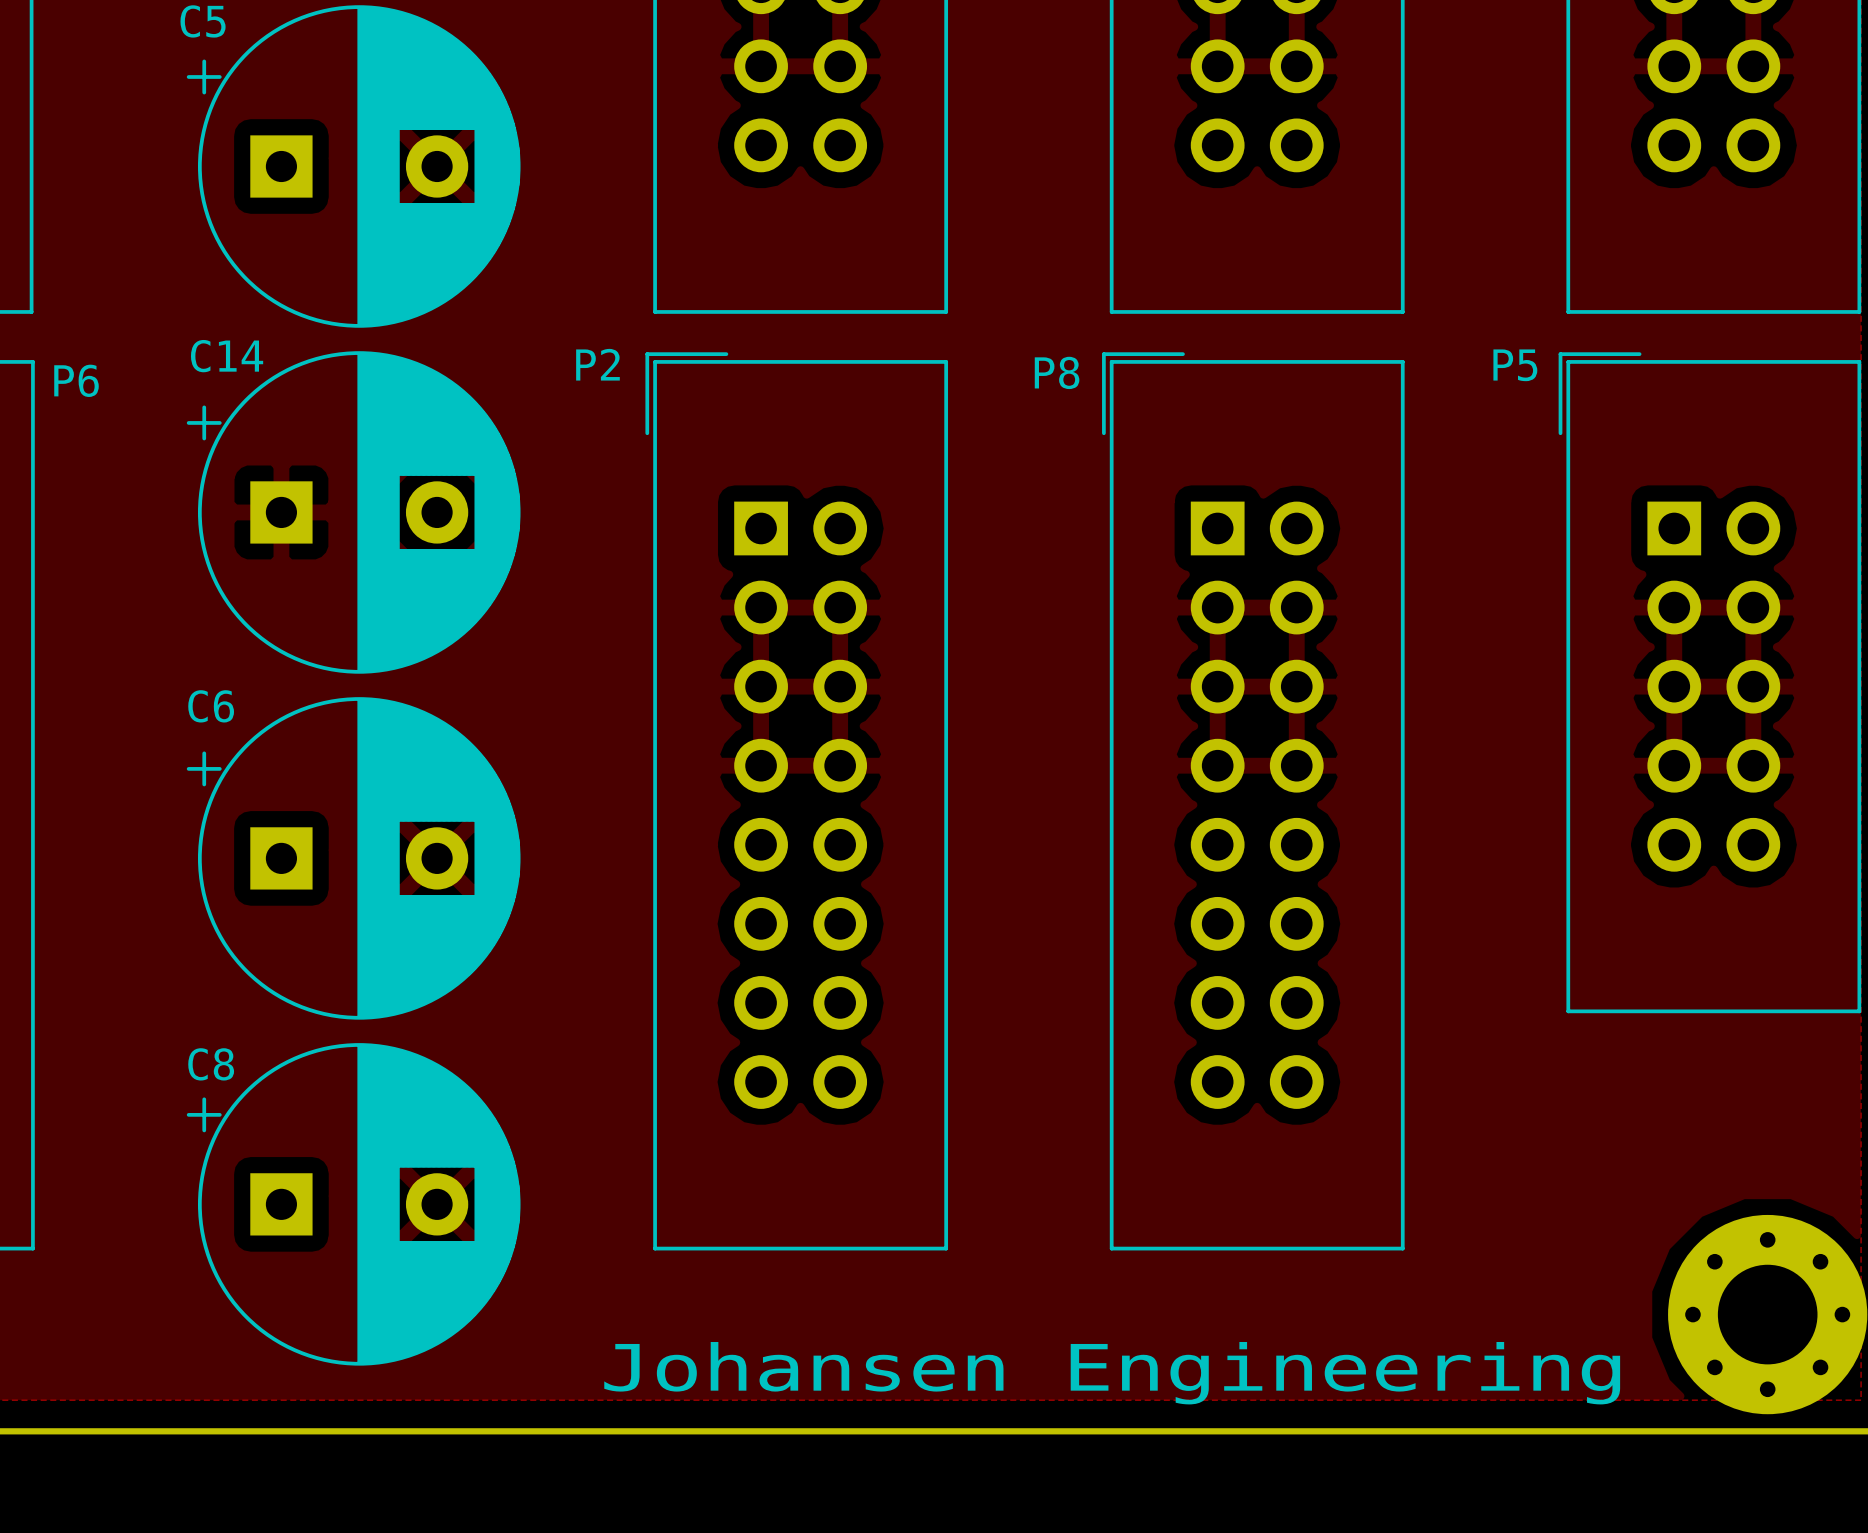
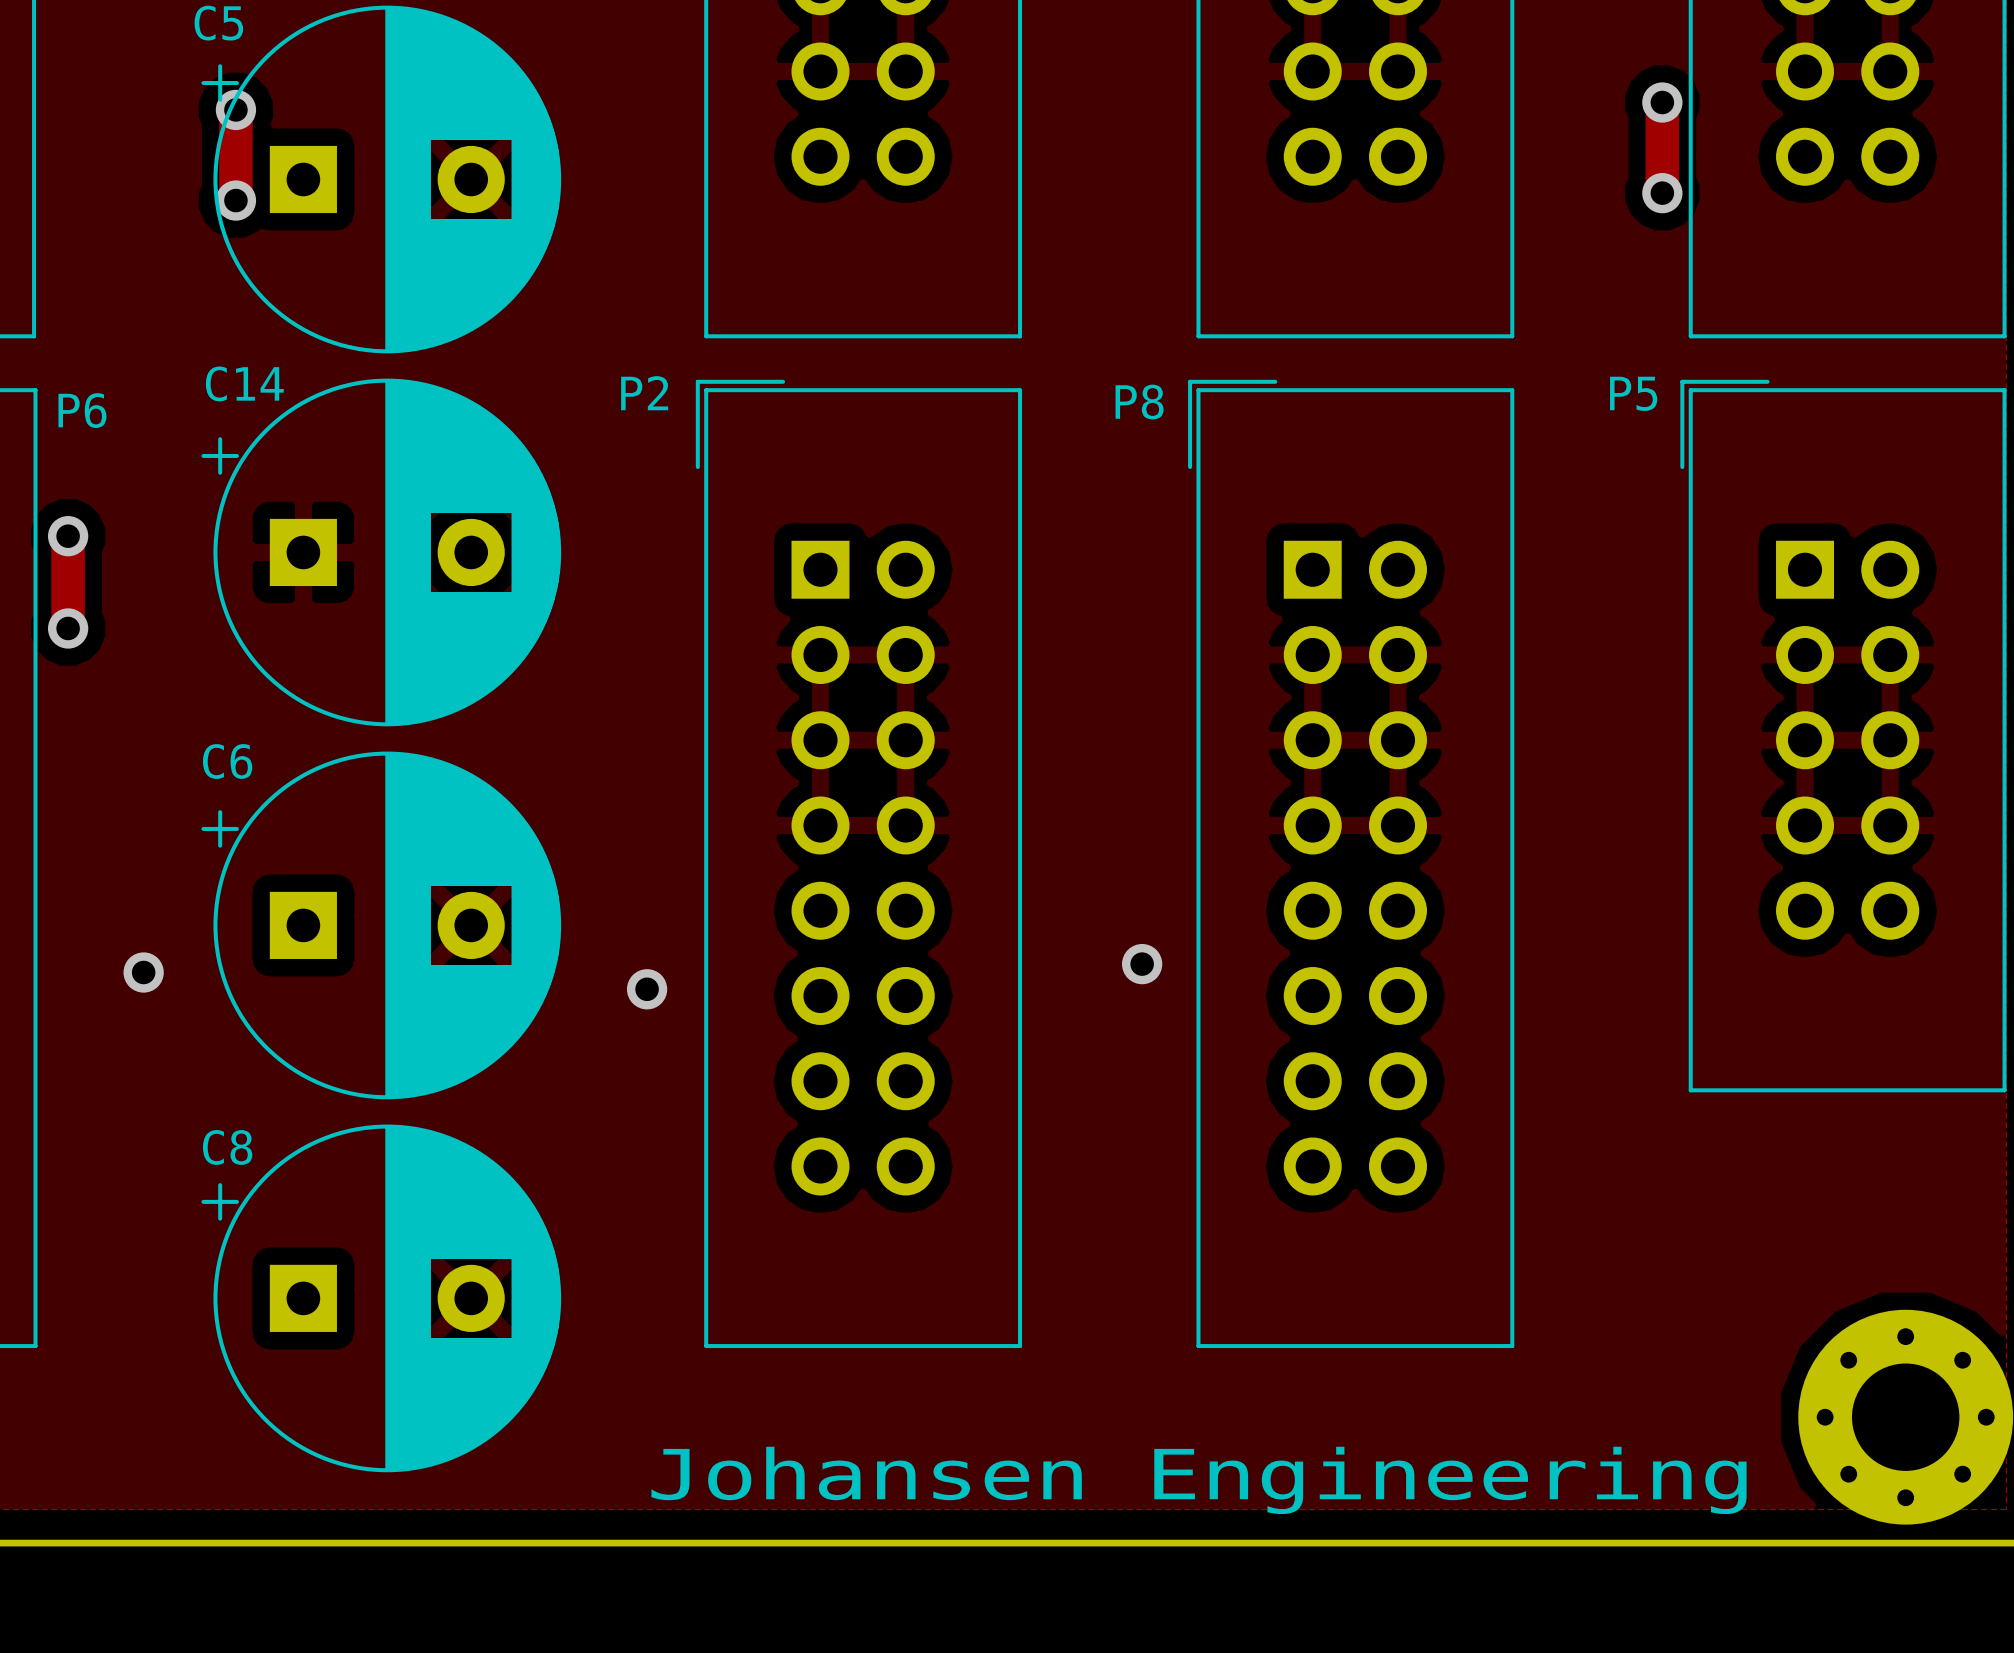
track: none -> (1662, 102) (1662, 193)
via: none -> (1662, 102)
track: none -> (235, 109) (235, 200)
via: none -> (235, 109)
via: none -> (1662, 193)
via: none -> (235, 200)
track: none -> (68, 536) (68, 628)
via: none -> (68, 536)
via: none -> (68, 628)
via: none -> (1142, 964)
via: none -> (143, 972)
via: none -> (647, 989)

